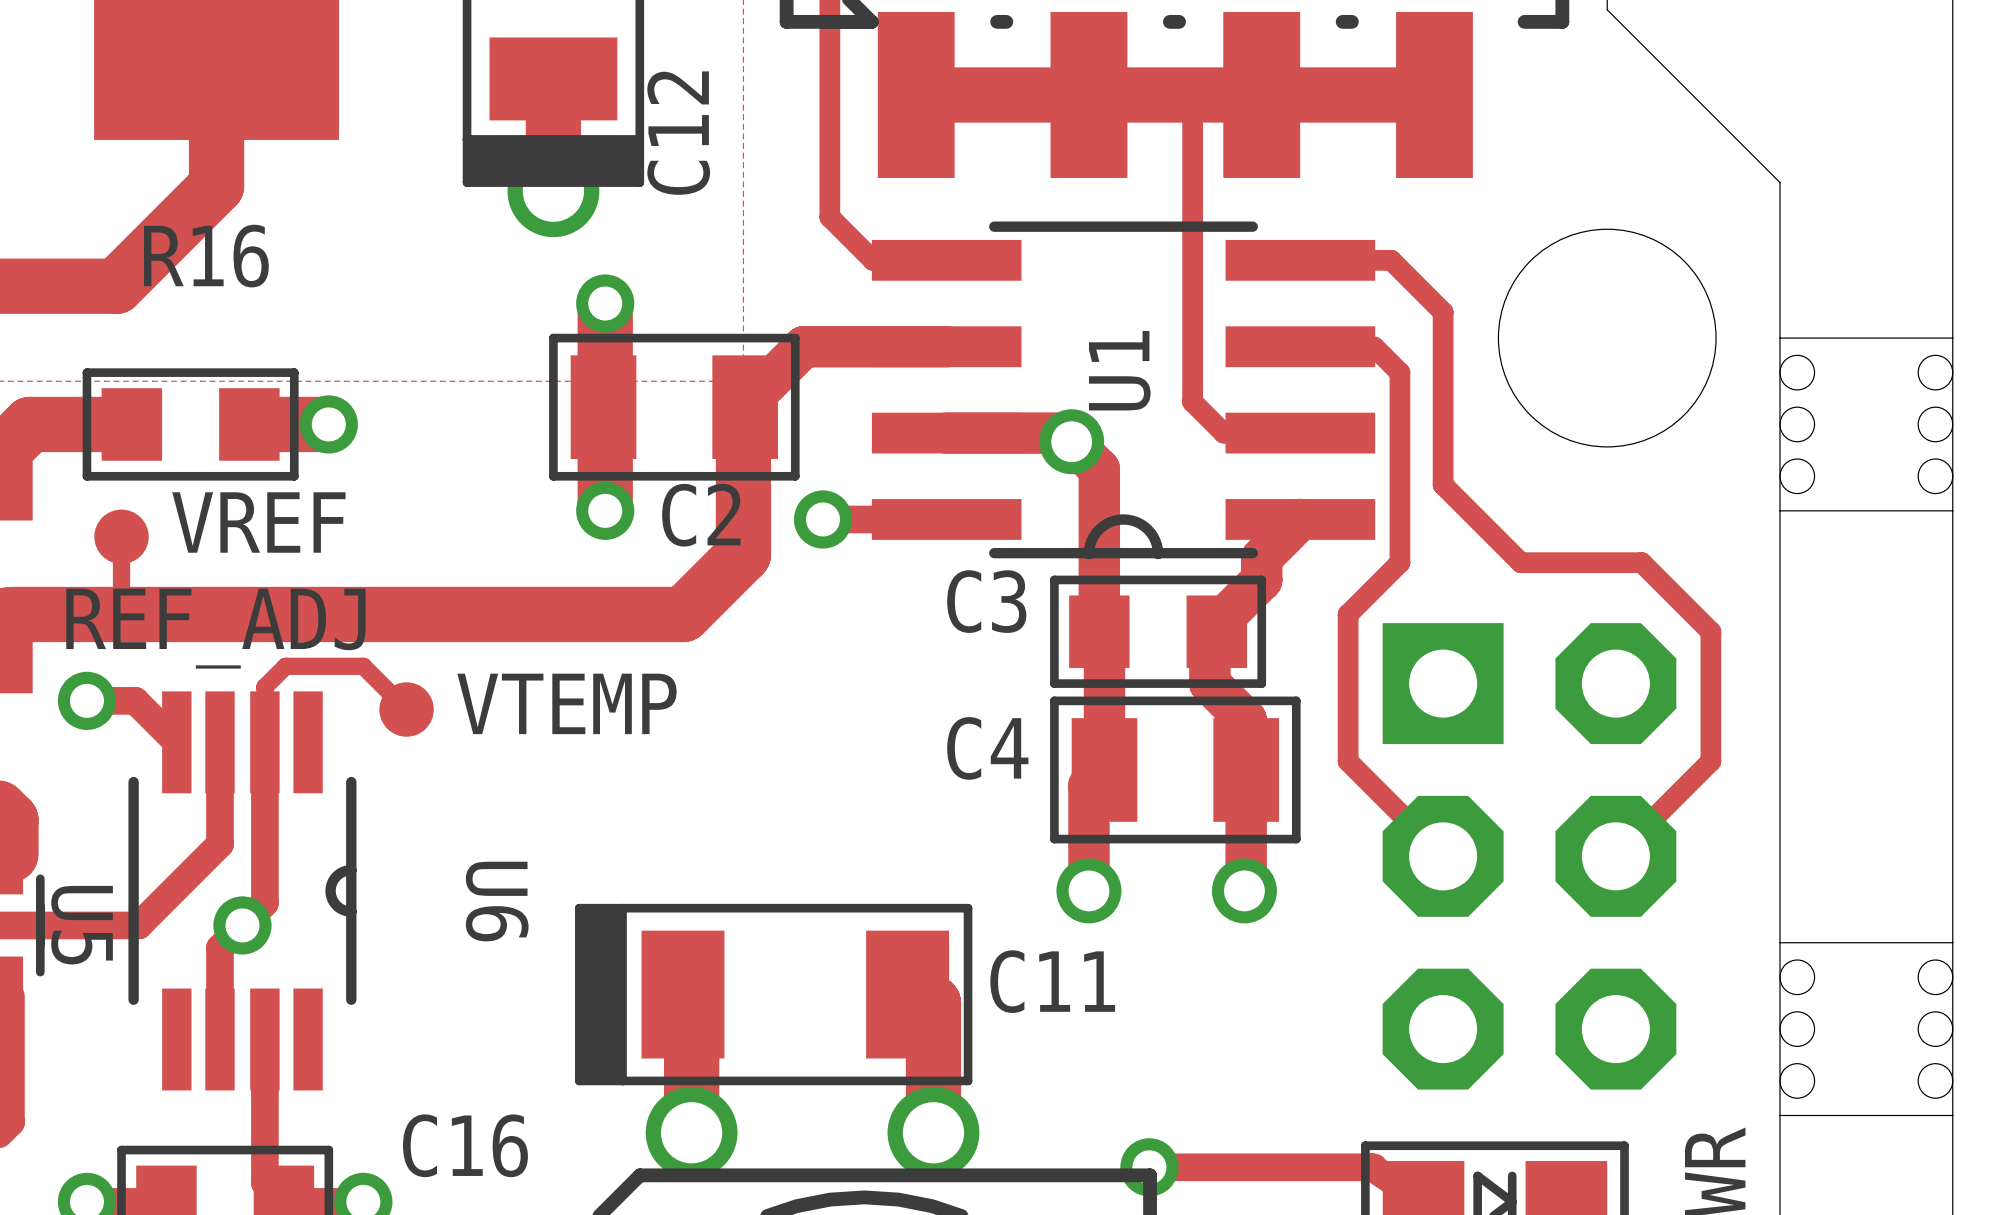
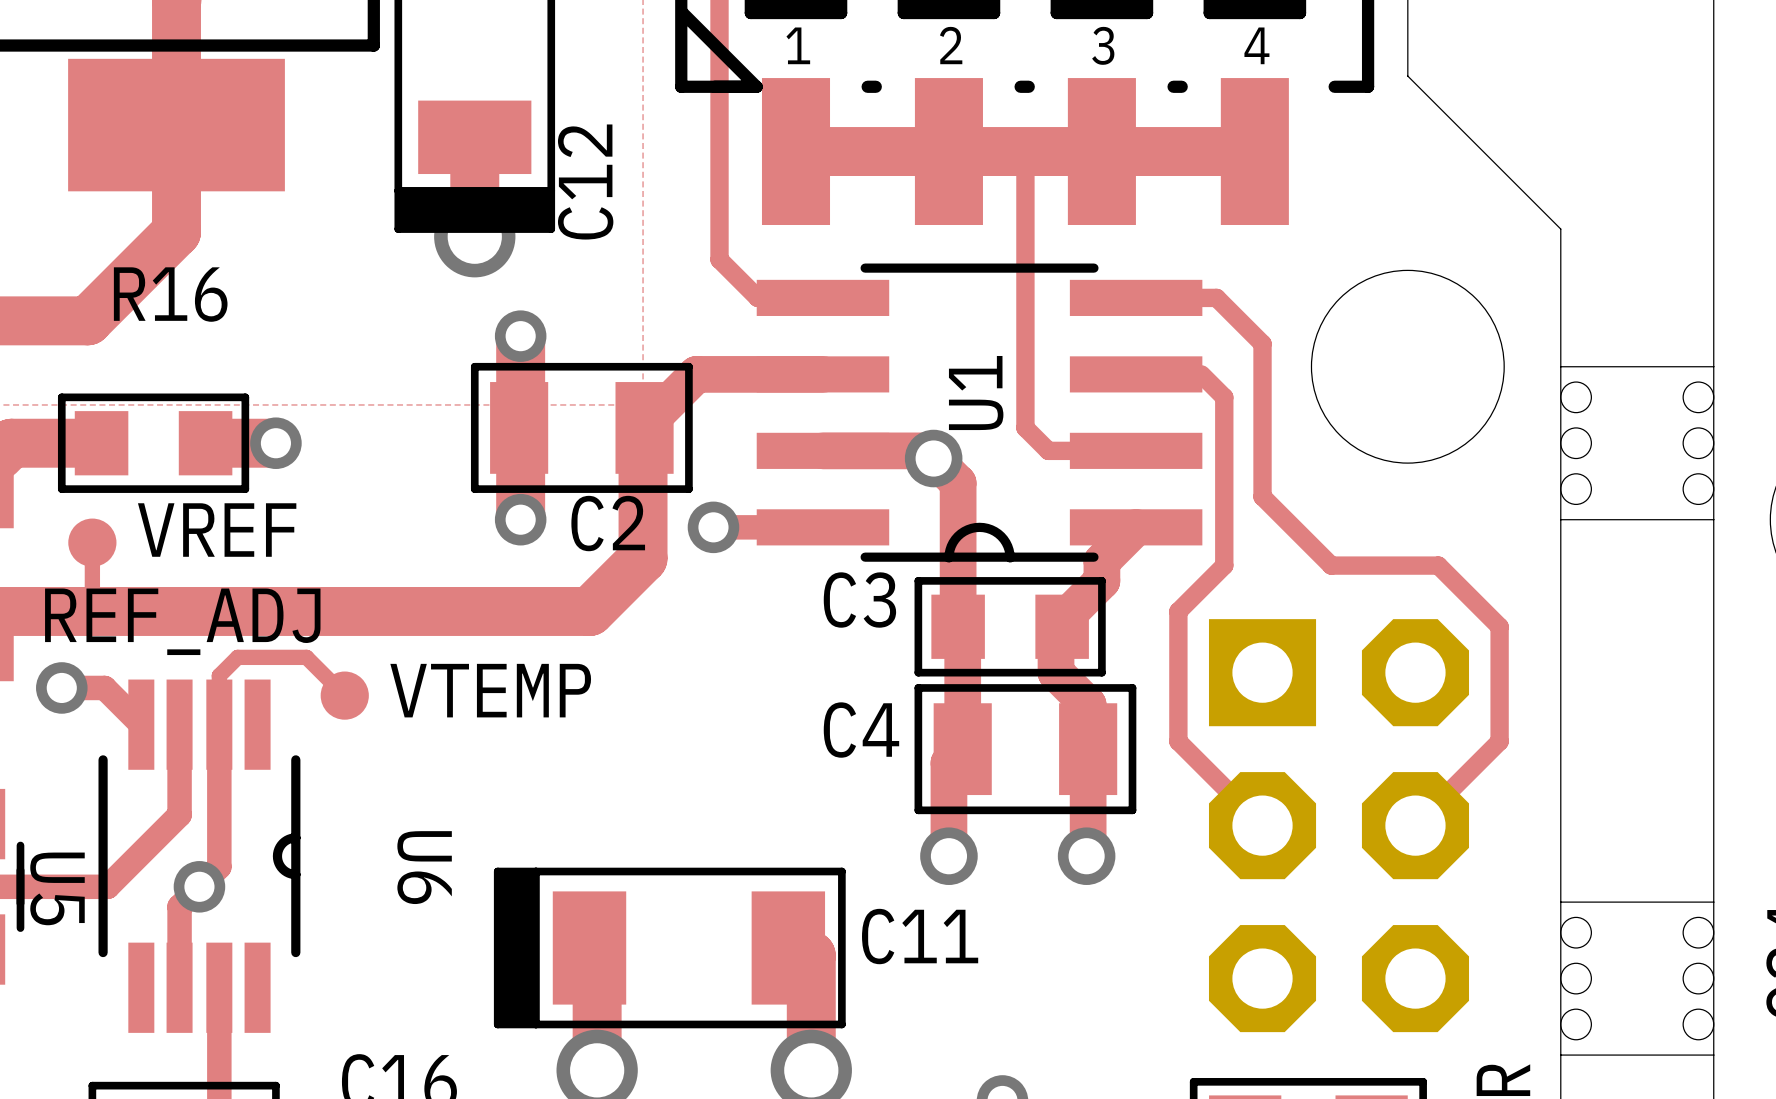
track: (1175, 96) (1192, 96) (1192, 401) (1223, 433) -> (1025, 152) (1025, 427) (1048, 450) (1068, 450)

